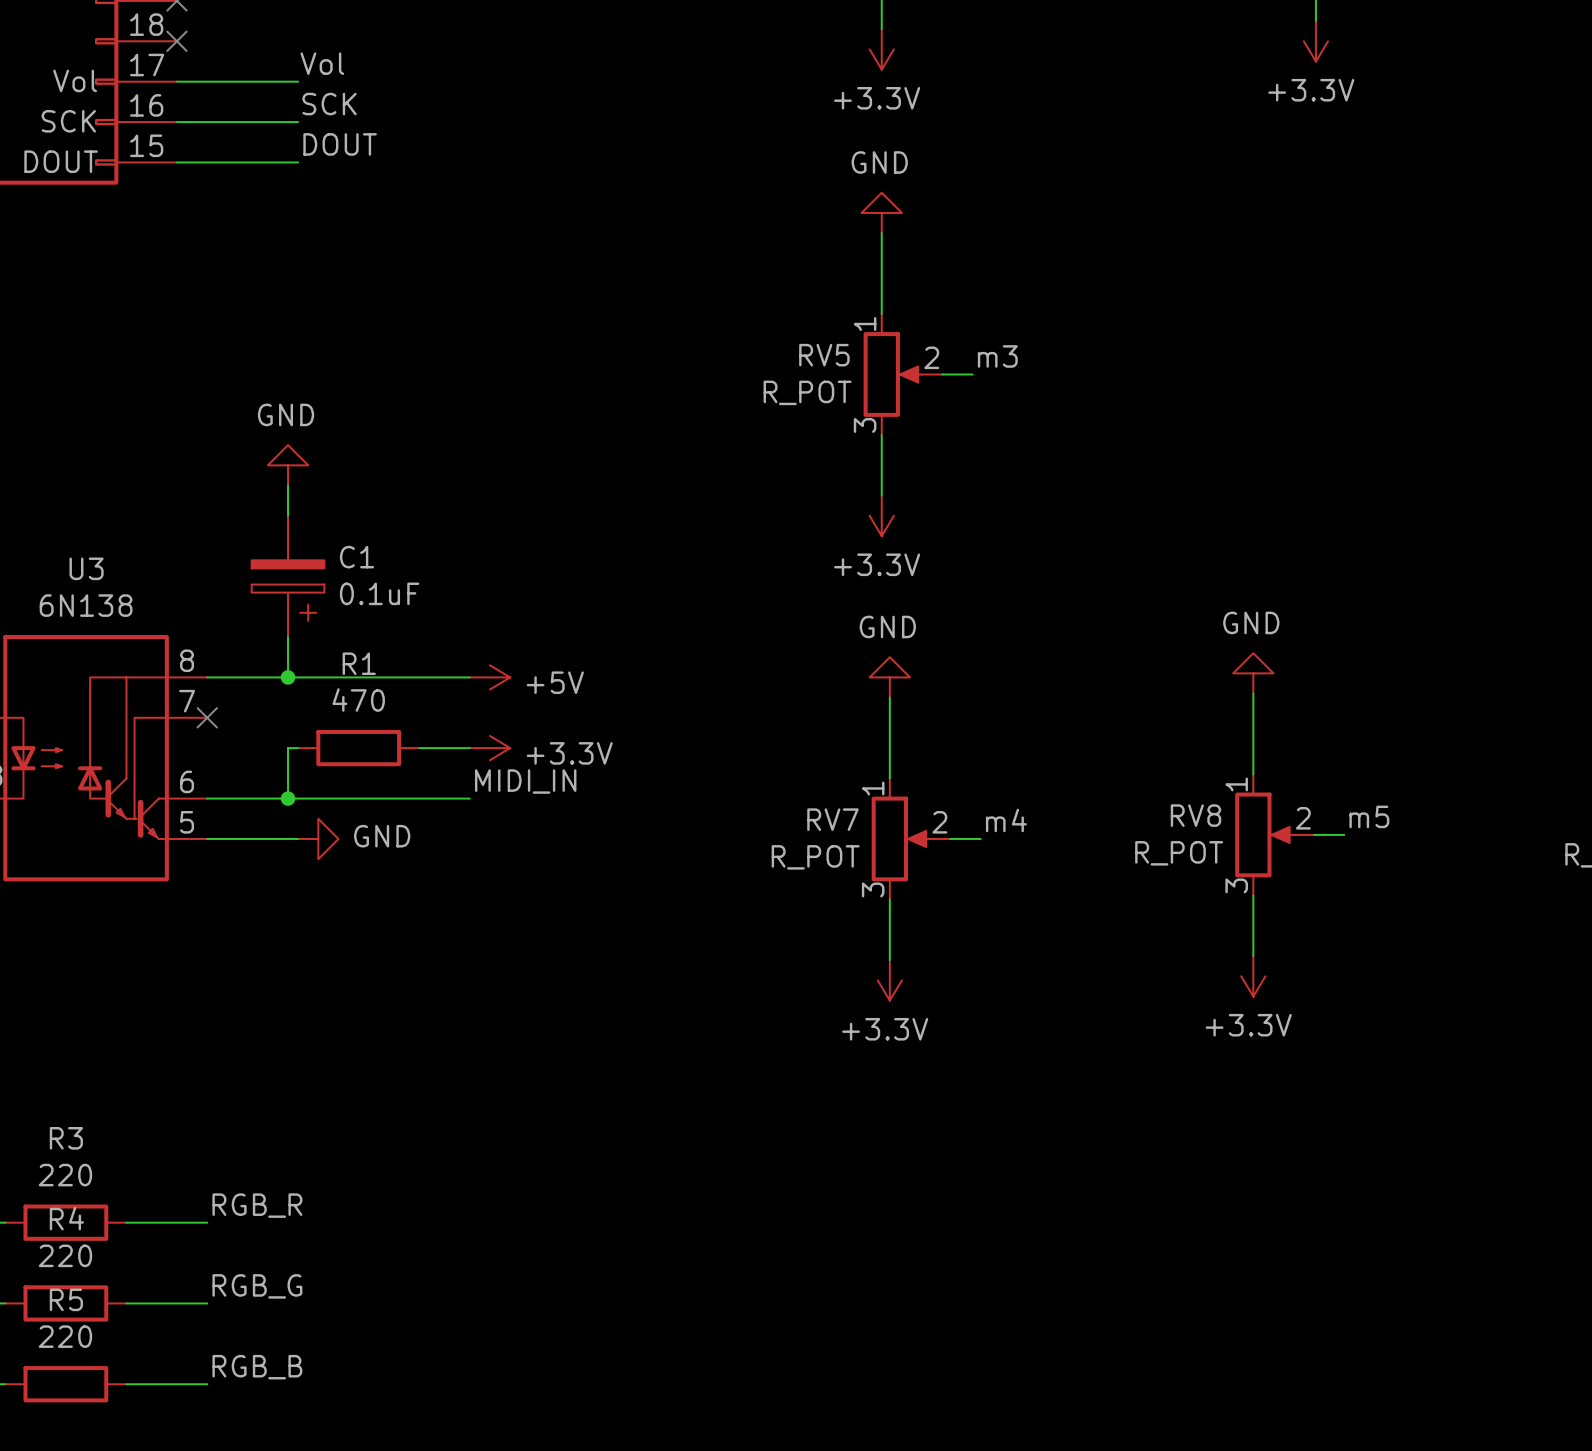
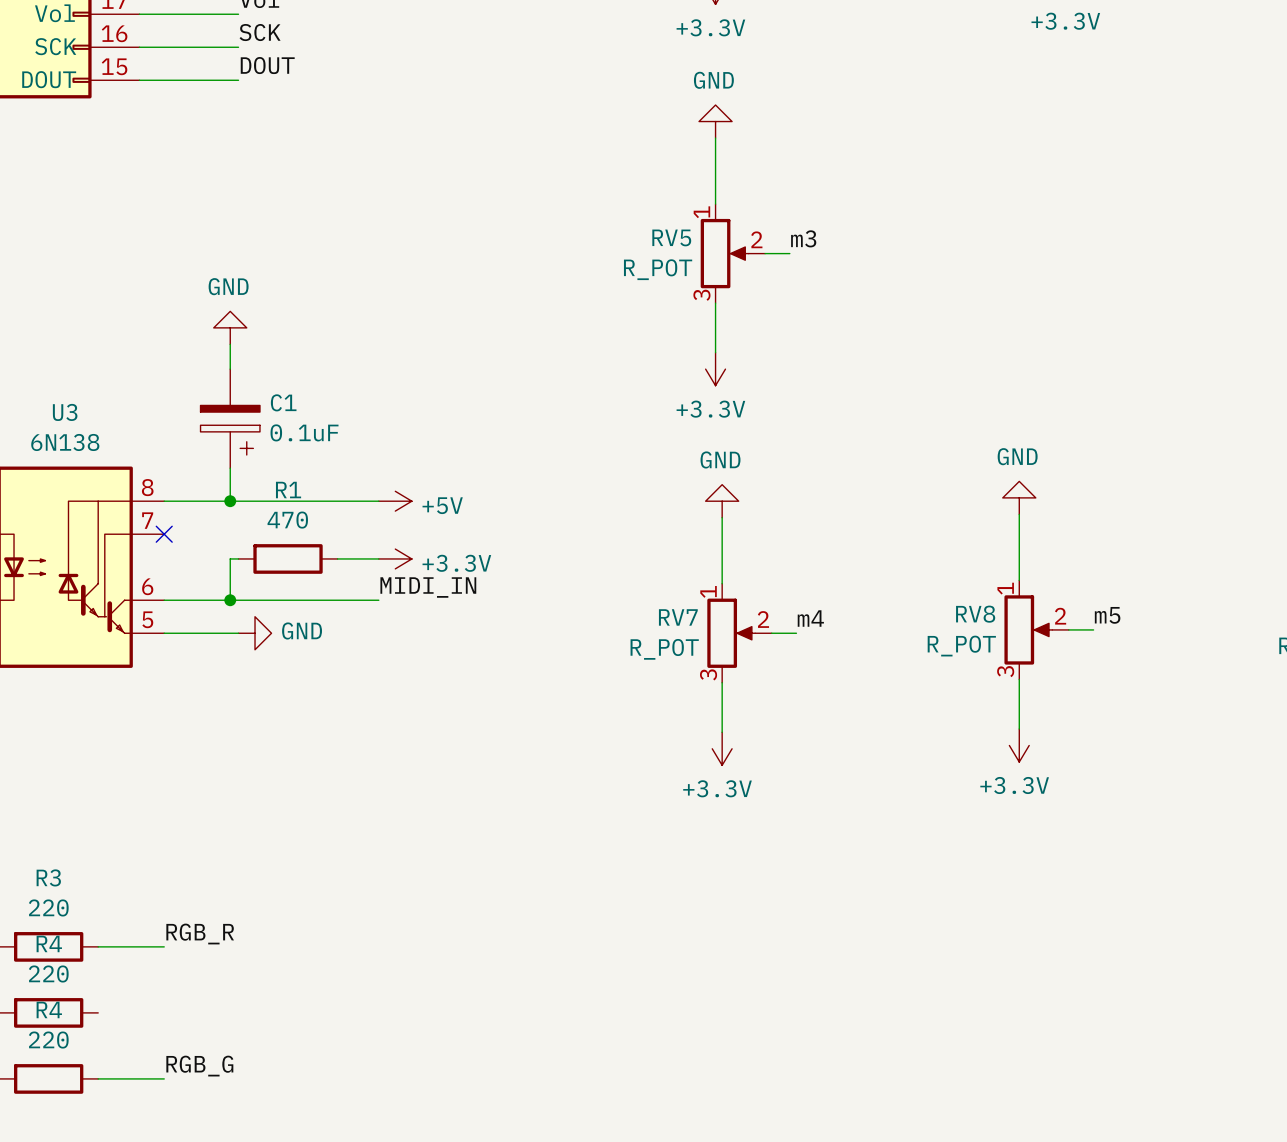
label: RGB_G (257, 1286) -> none
R5 name: R5 (66, 1299) -> R4 (49, 1009)
wire: (126, 1303) (207, 1303) -> none
label: RGB_B (257, 1367) -> RGB_G (199, 1066)

